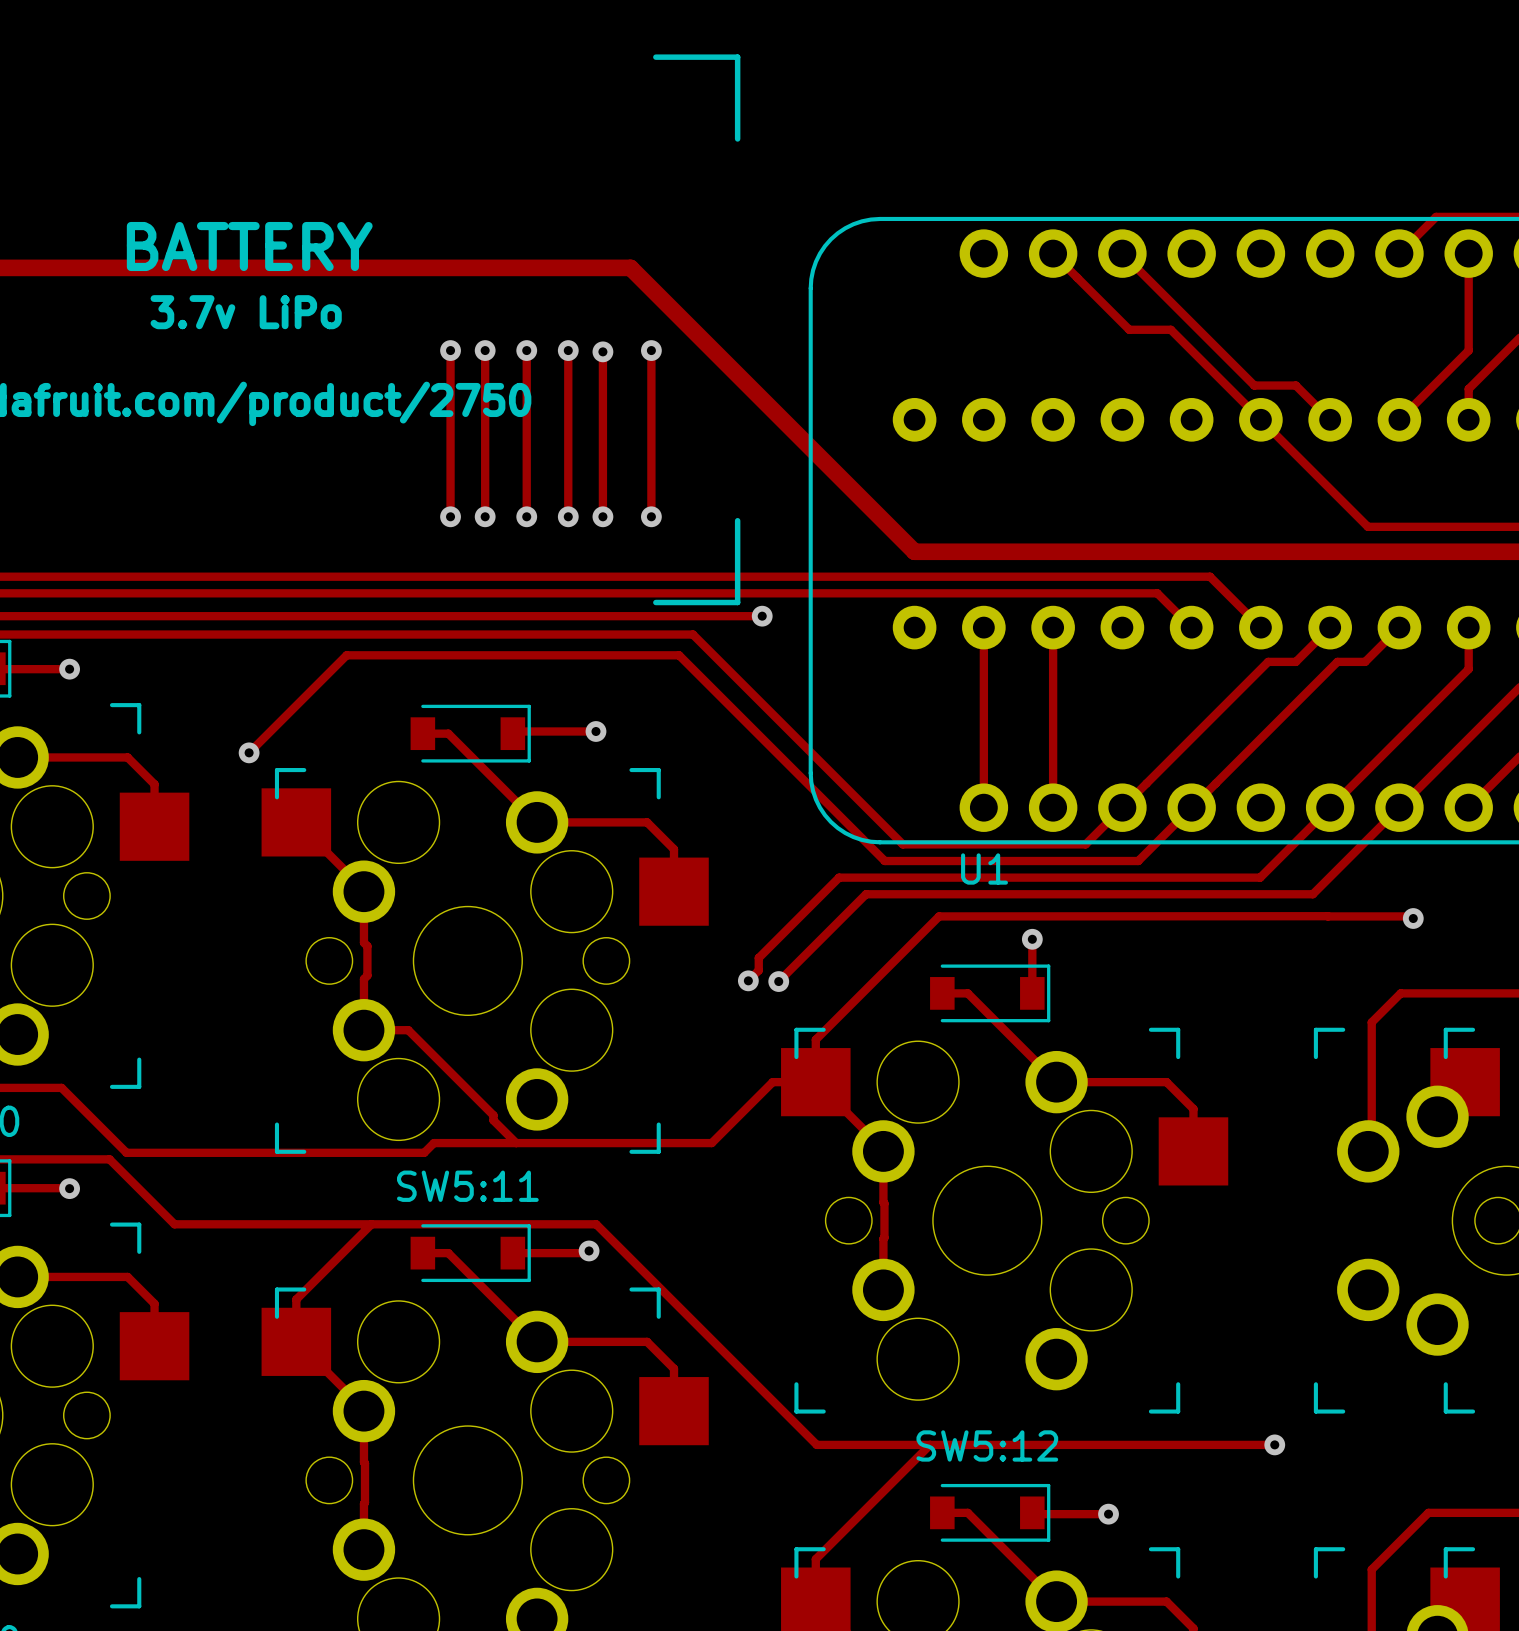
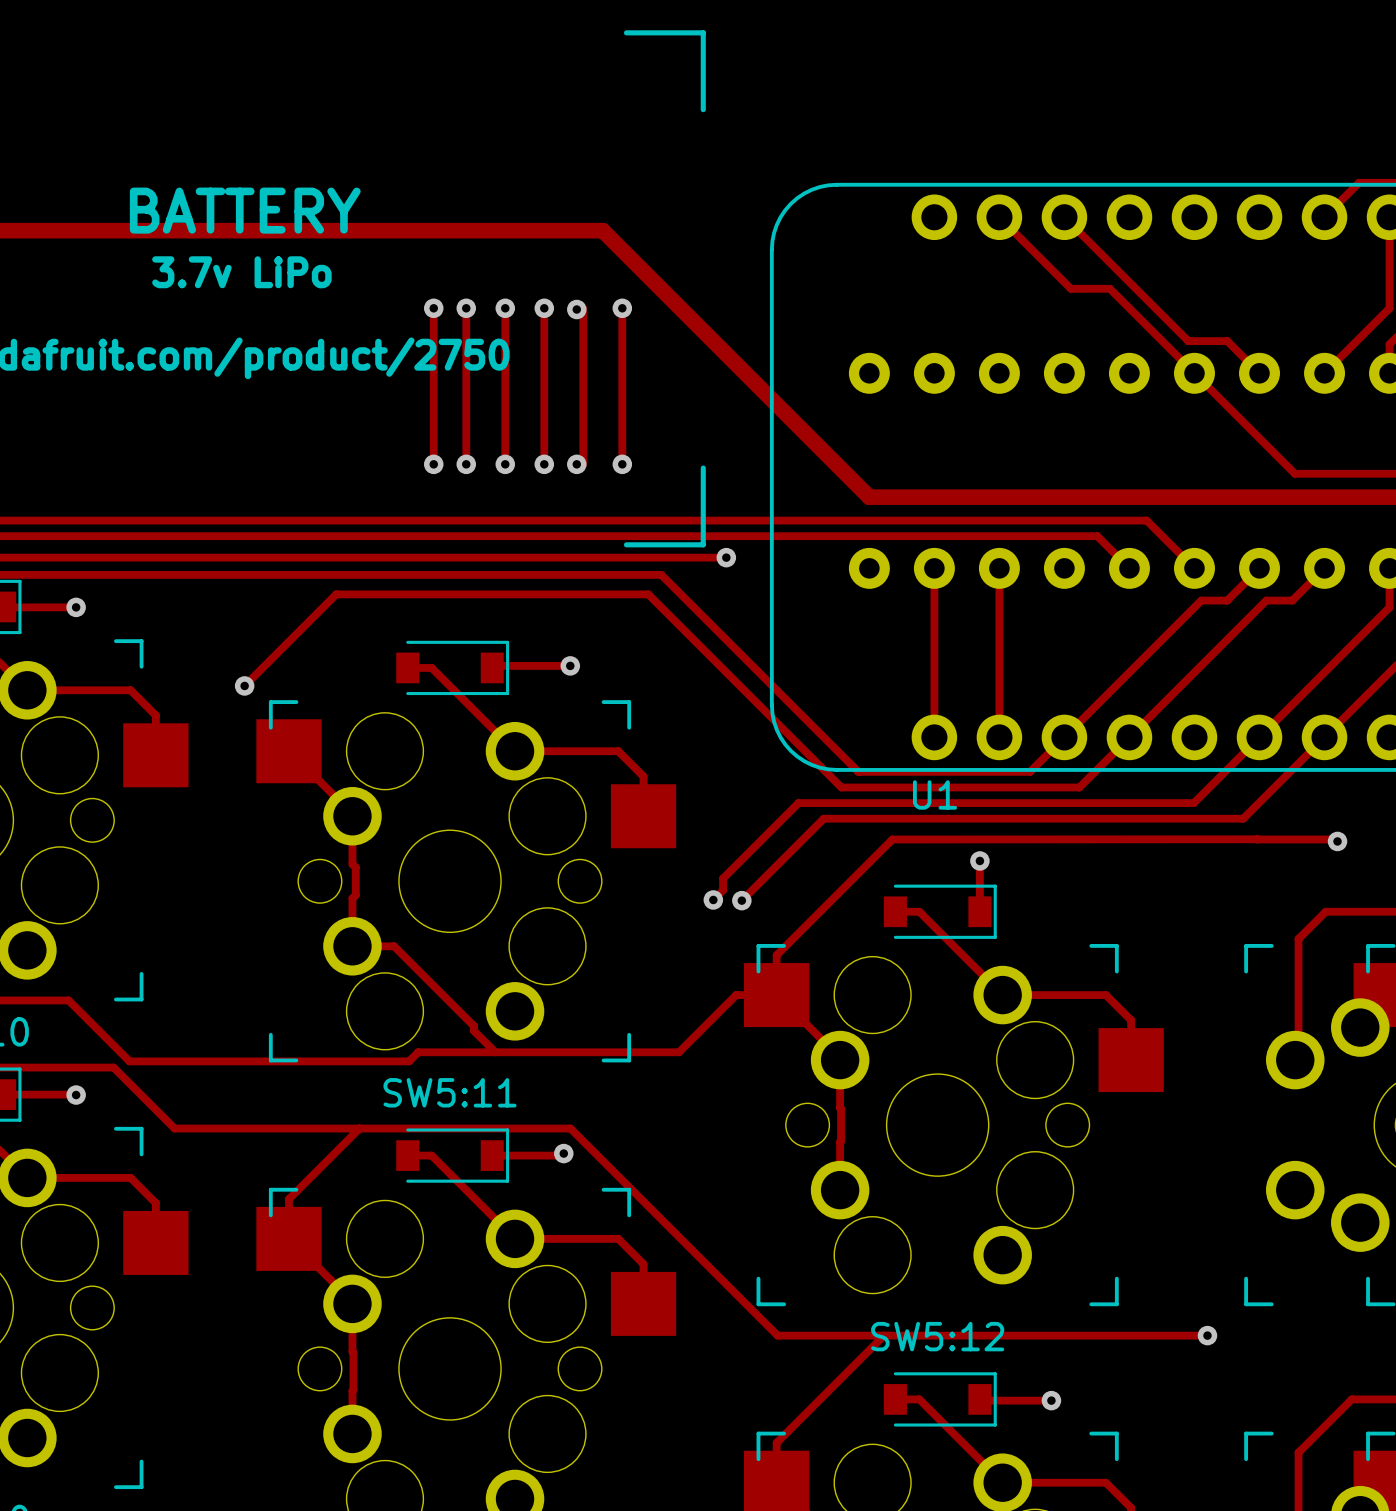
track: none -> (583, 308) (583, 464)
track: (602, 351) (602, 516) -> none

